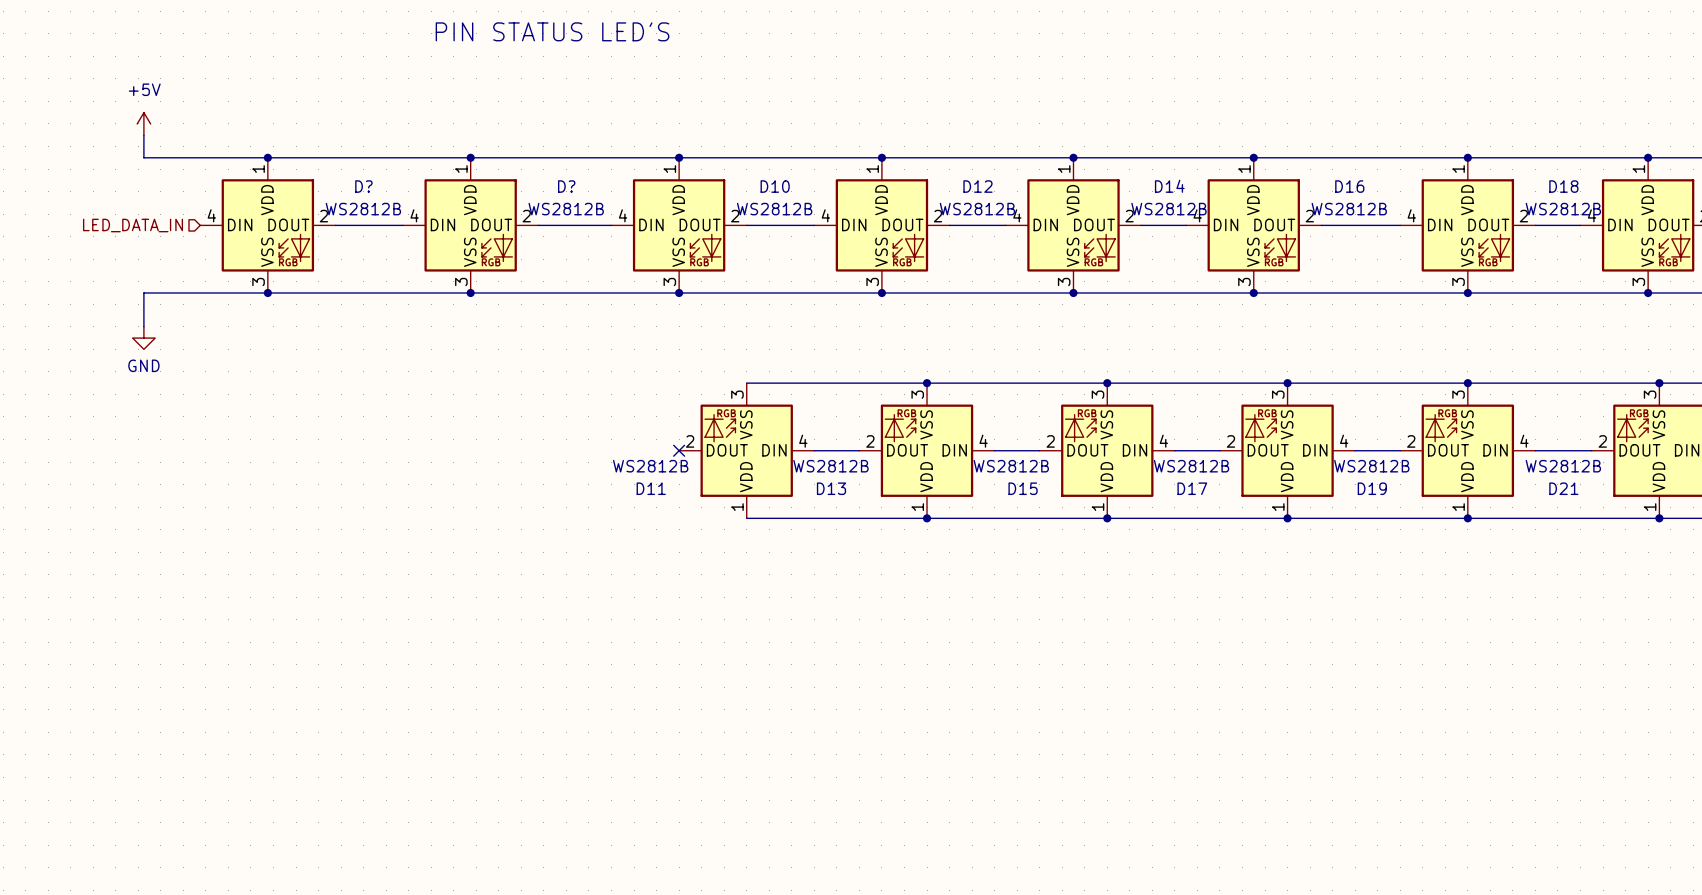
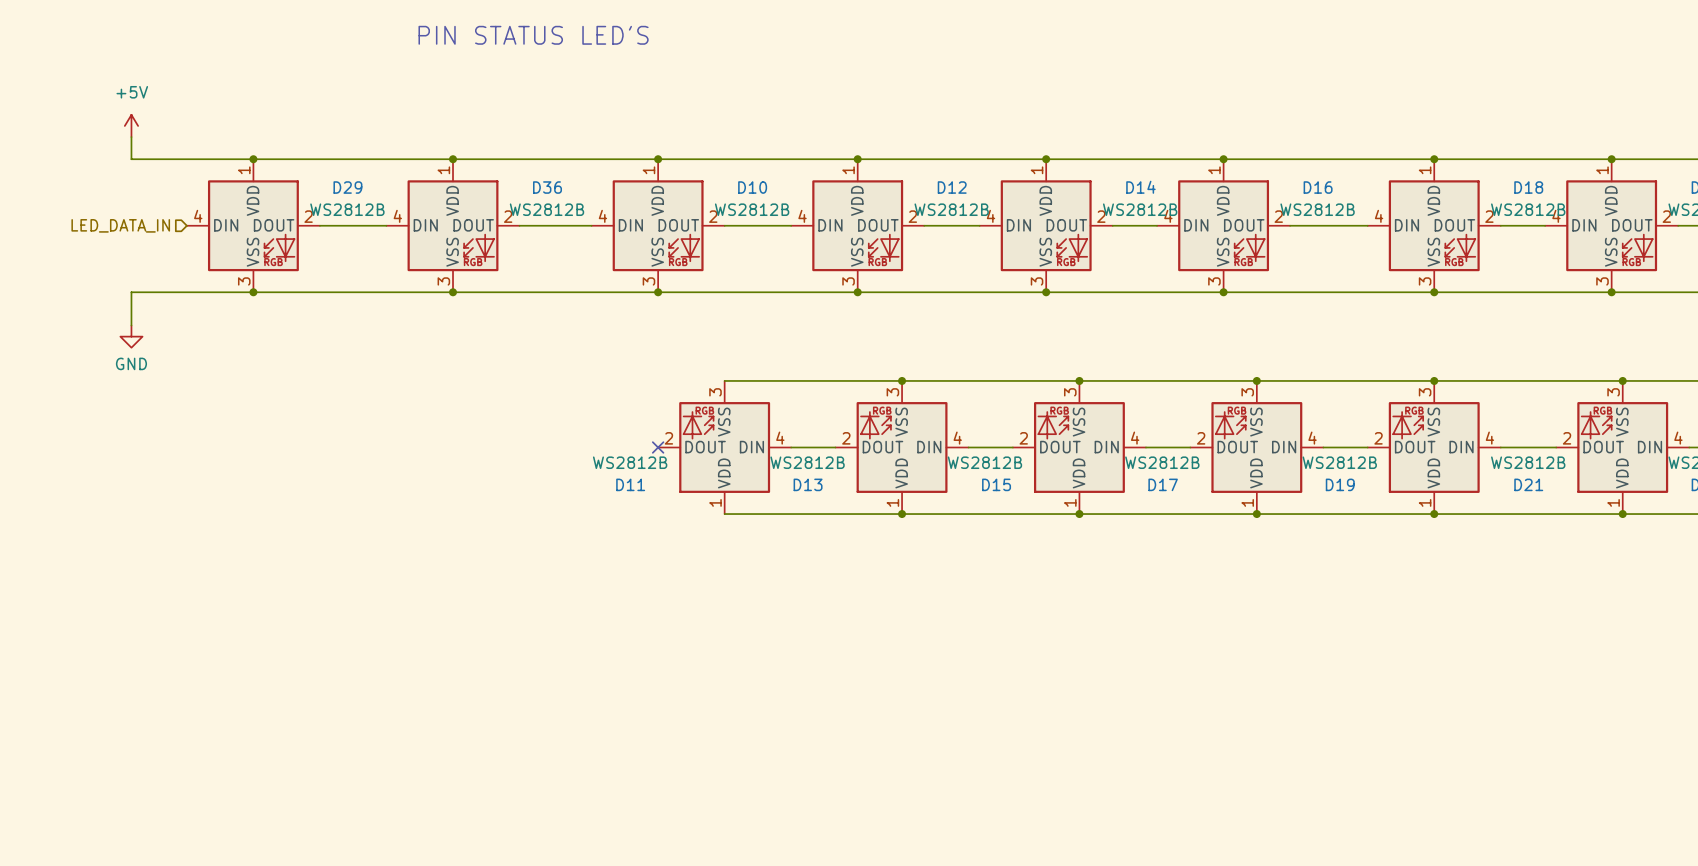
D? name: D? (363, 186) -> D29 (347, 187)
D? name: D? (566, 186) -> D36 (547, 187)

